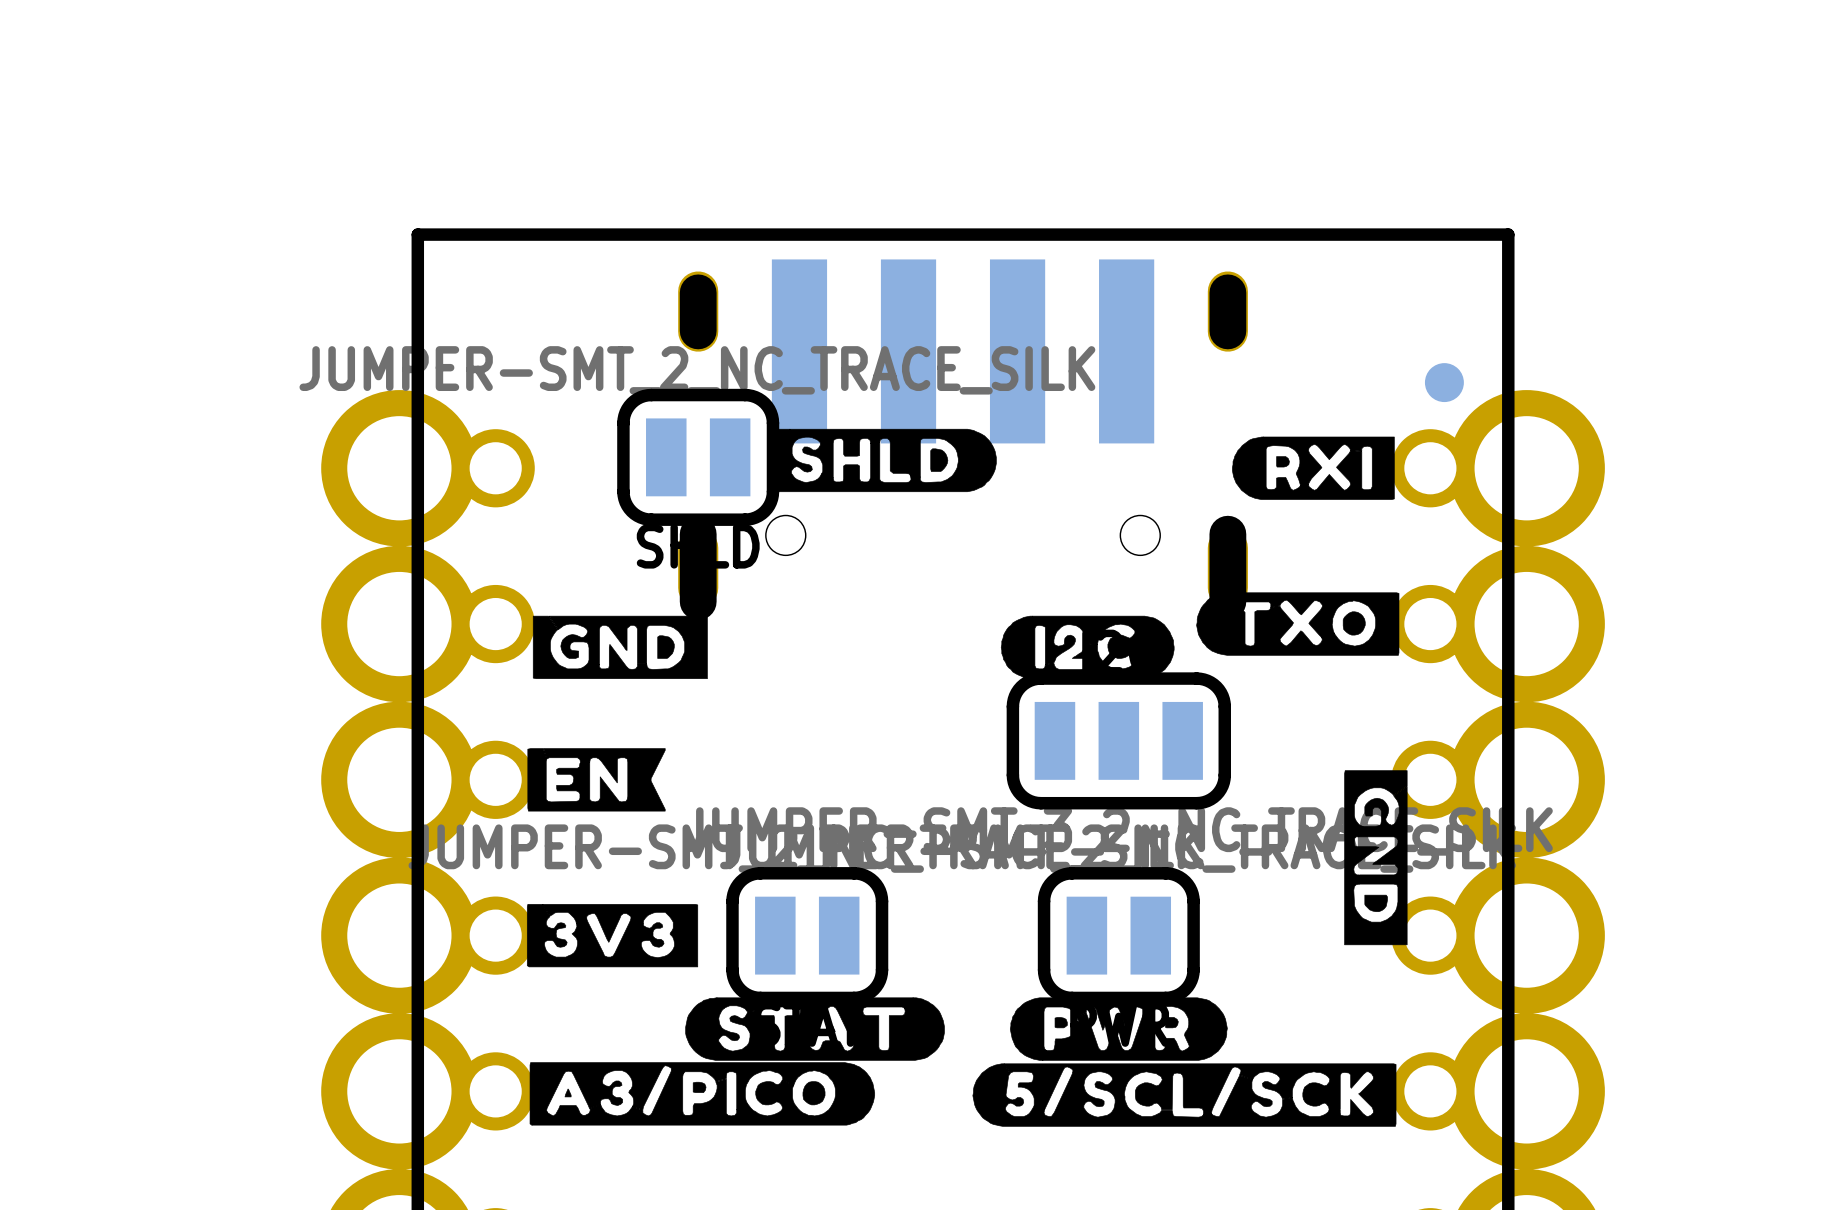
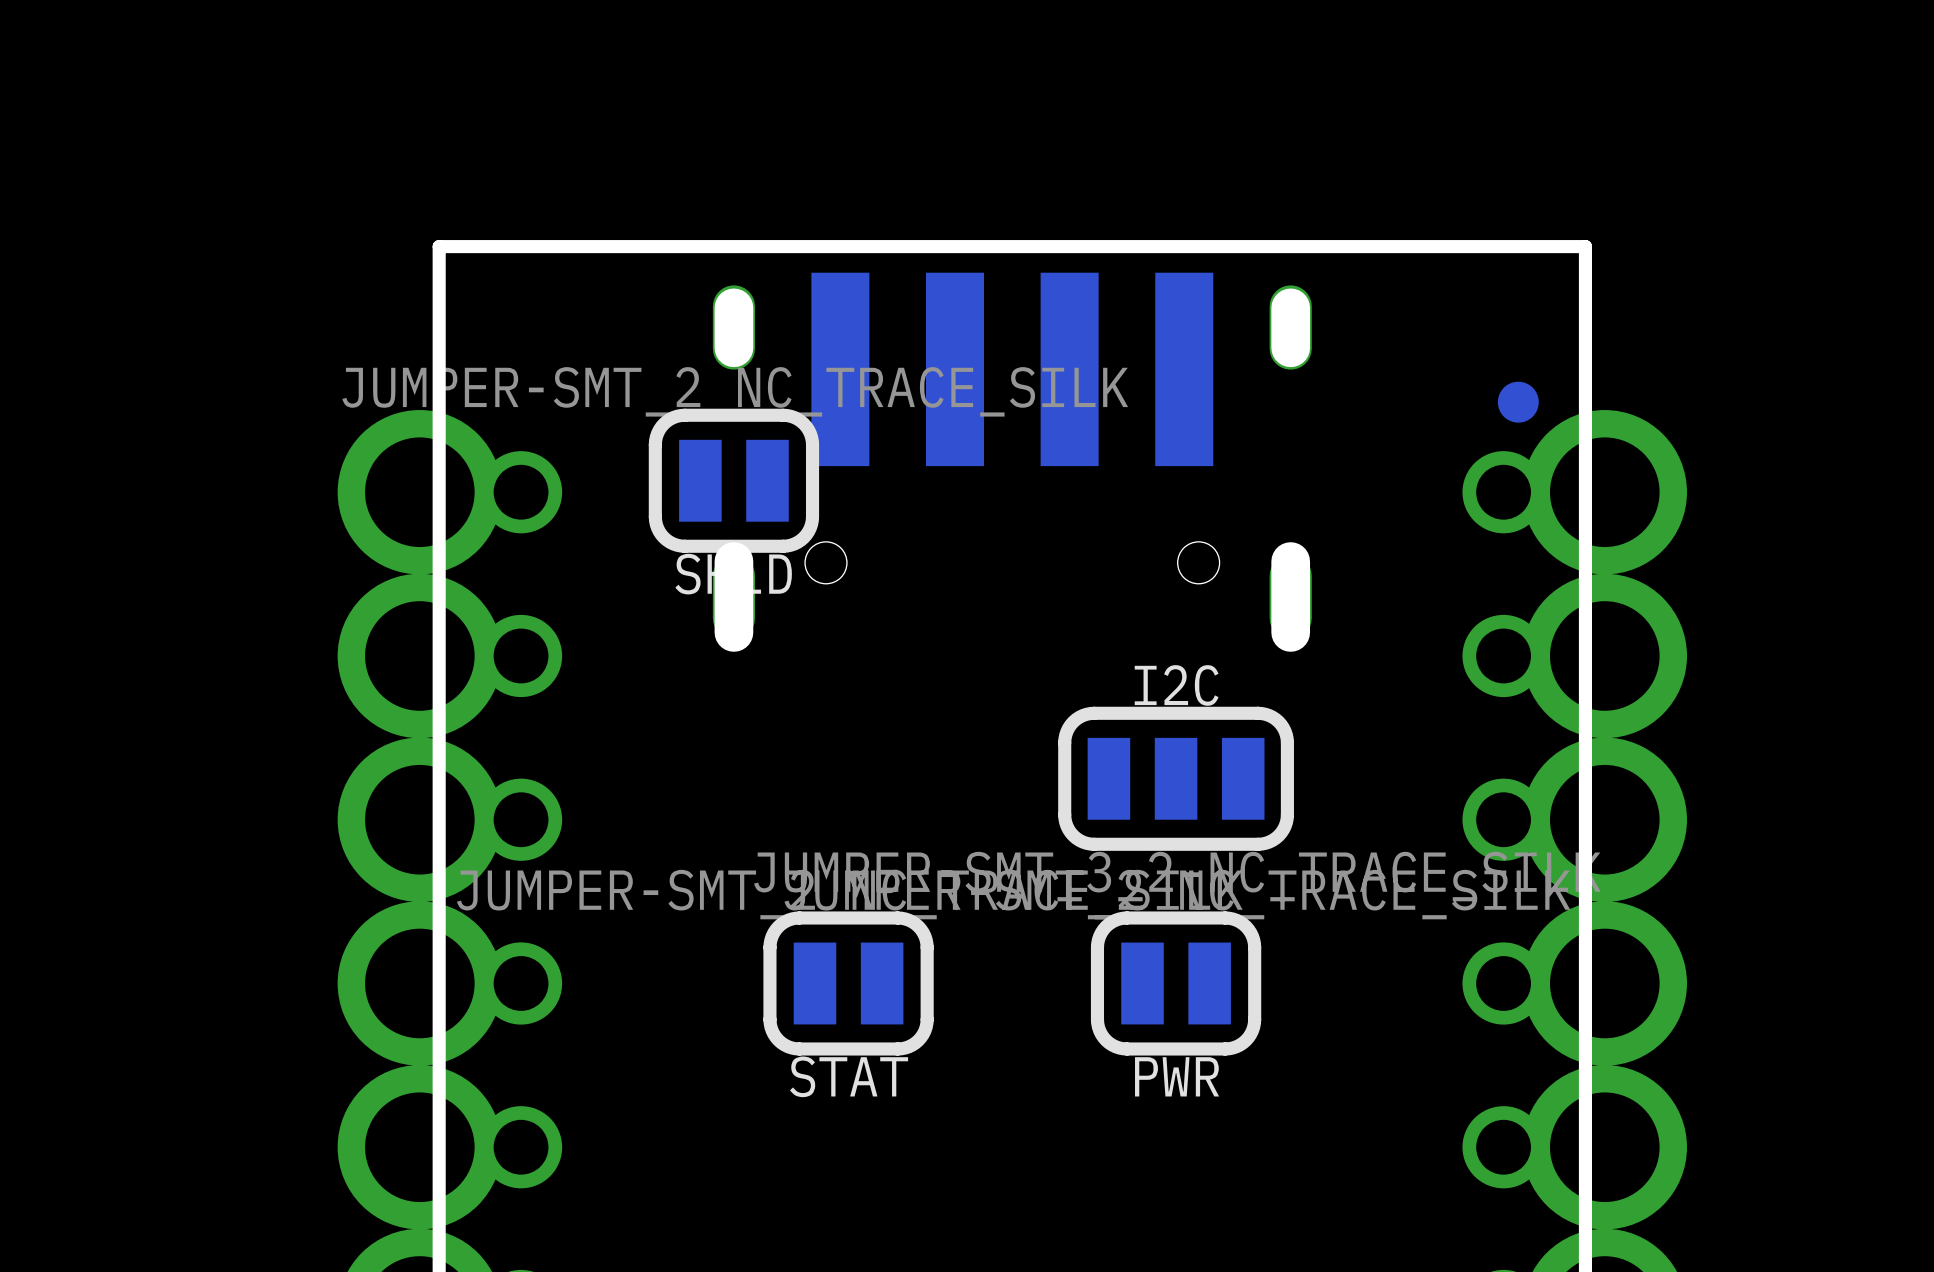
drawing: [774, 428, 997, 493] -> none
drawing: [1232, 436, 1395, 500] -> none
drawing: [1000, 592, 1400, 680] -> none
drawing: [527, 615, 708, 812] -> none
drawing: [1344, 770, 1408, 946] -> none
drawing: [526, 904, 1397, 1127] -> none

